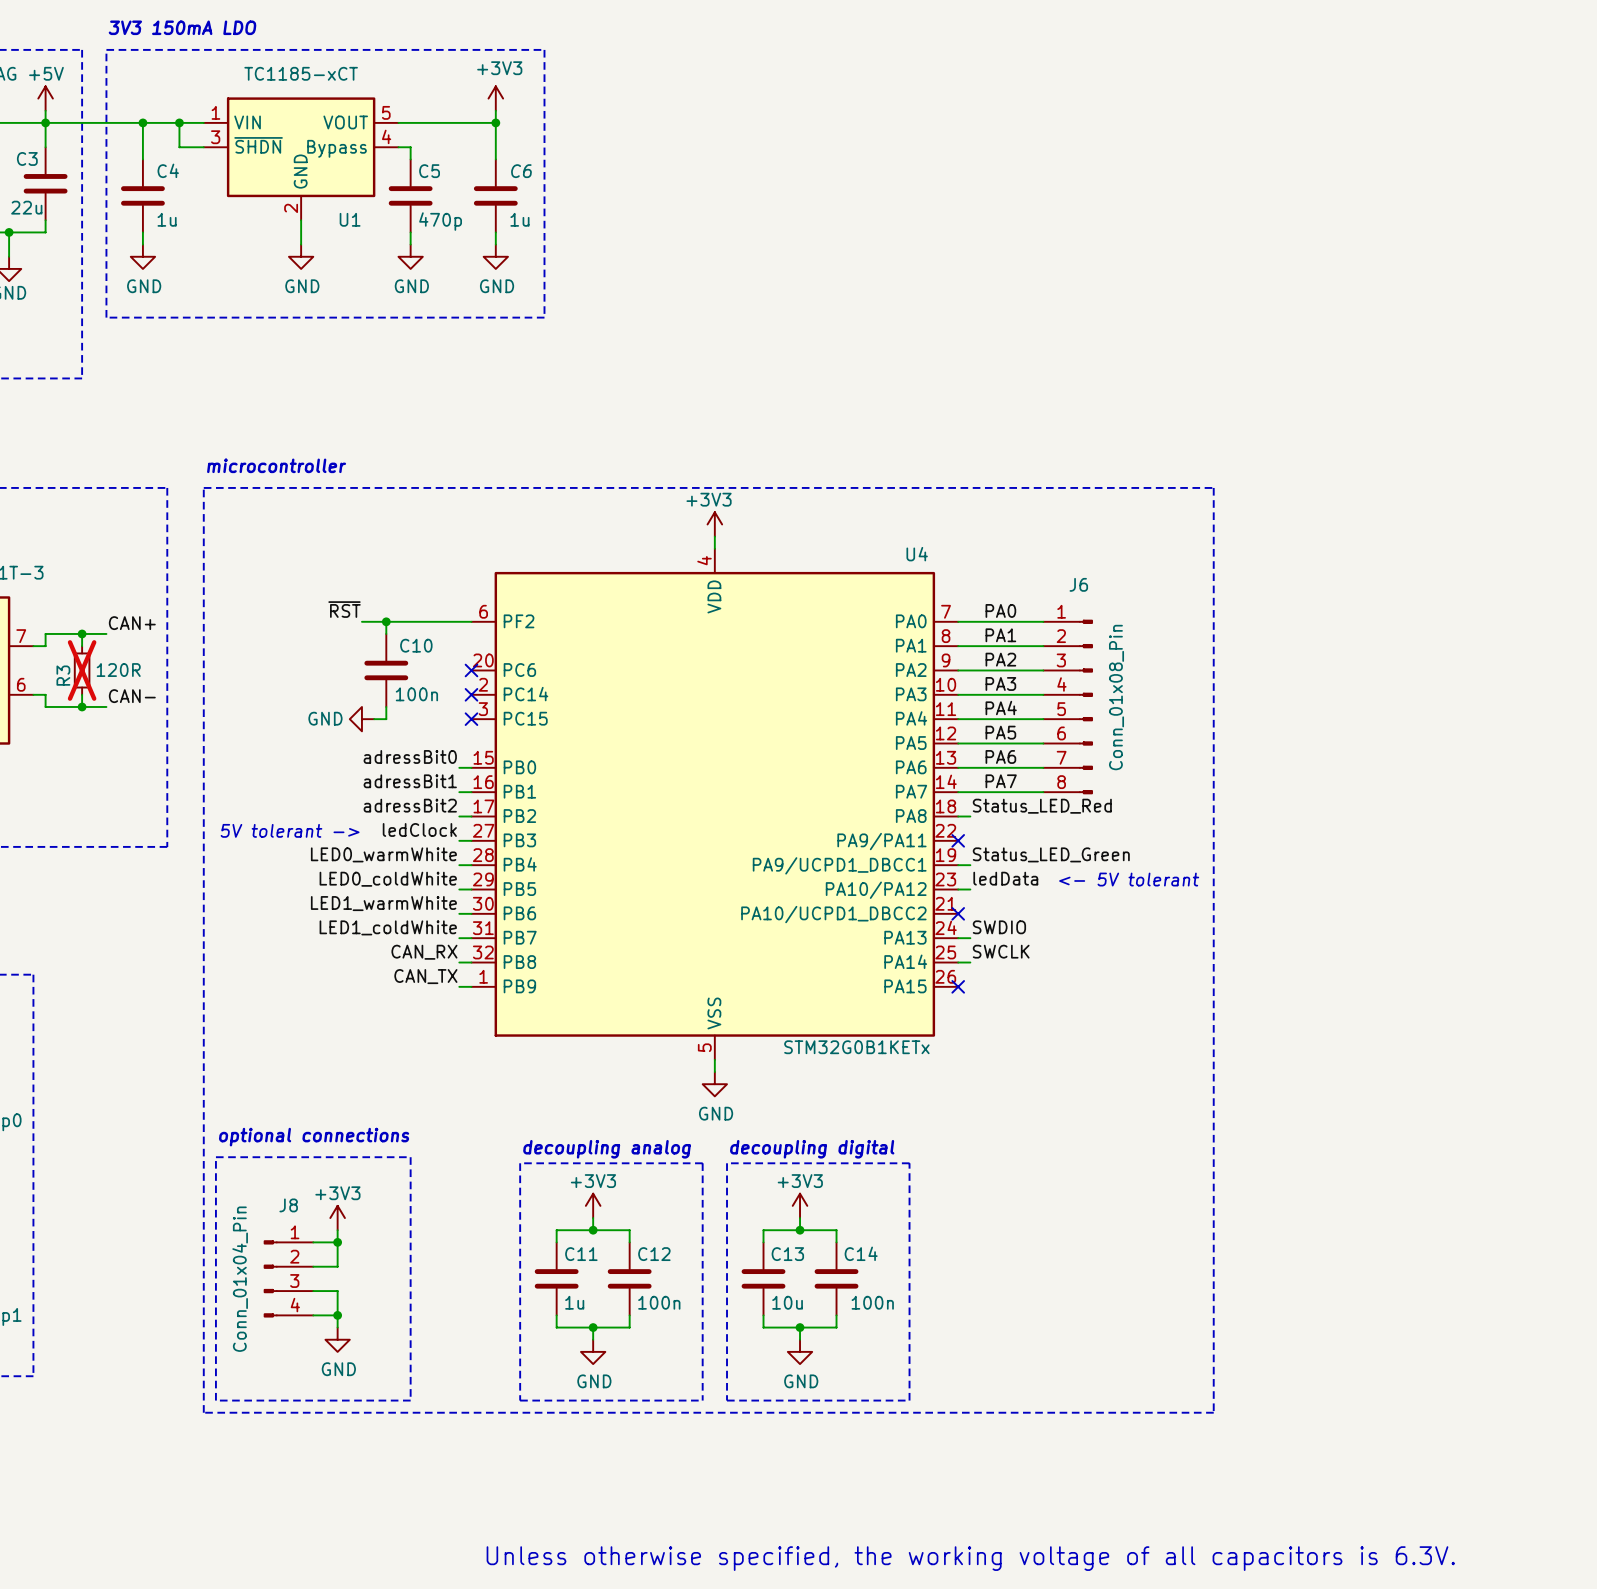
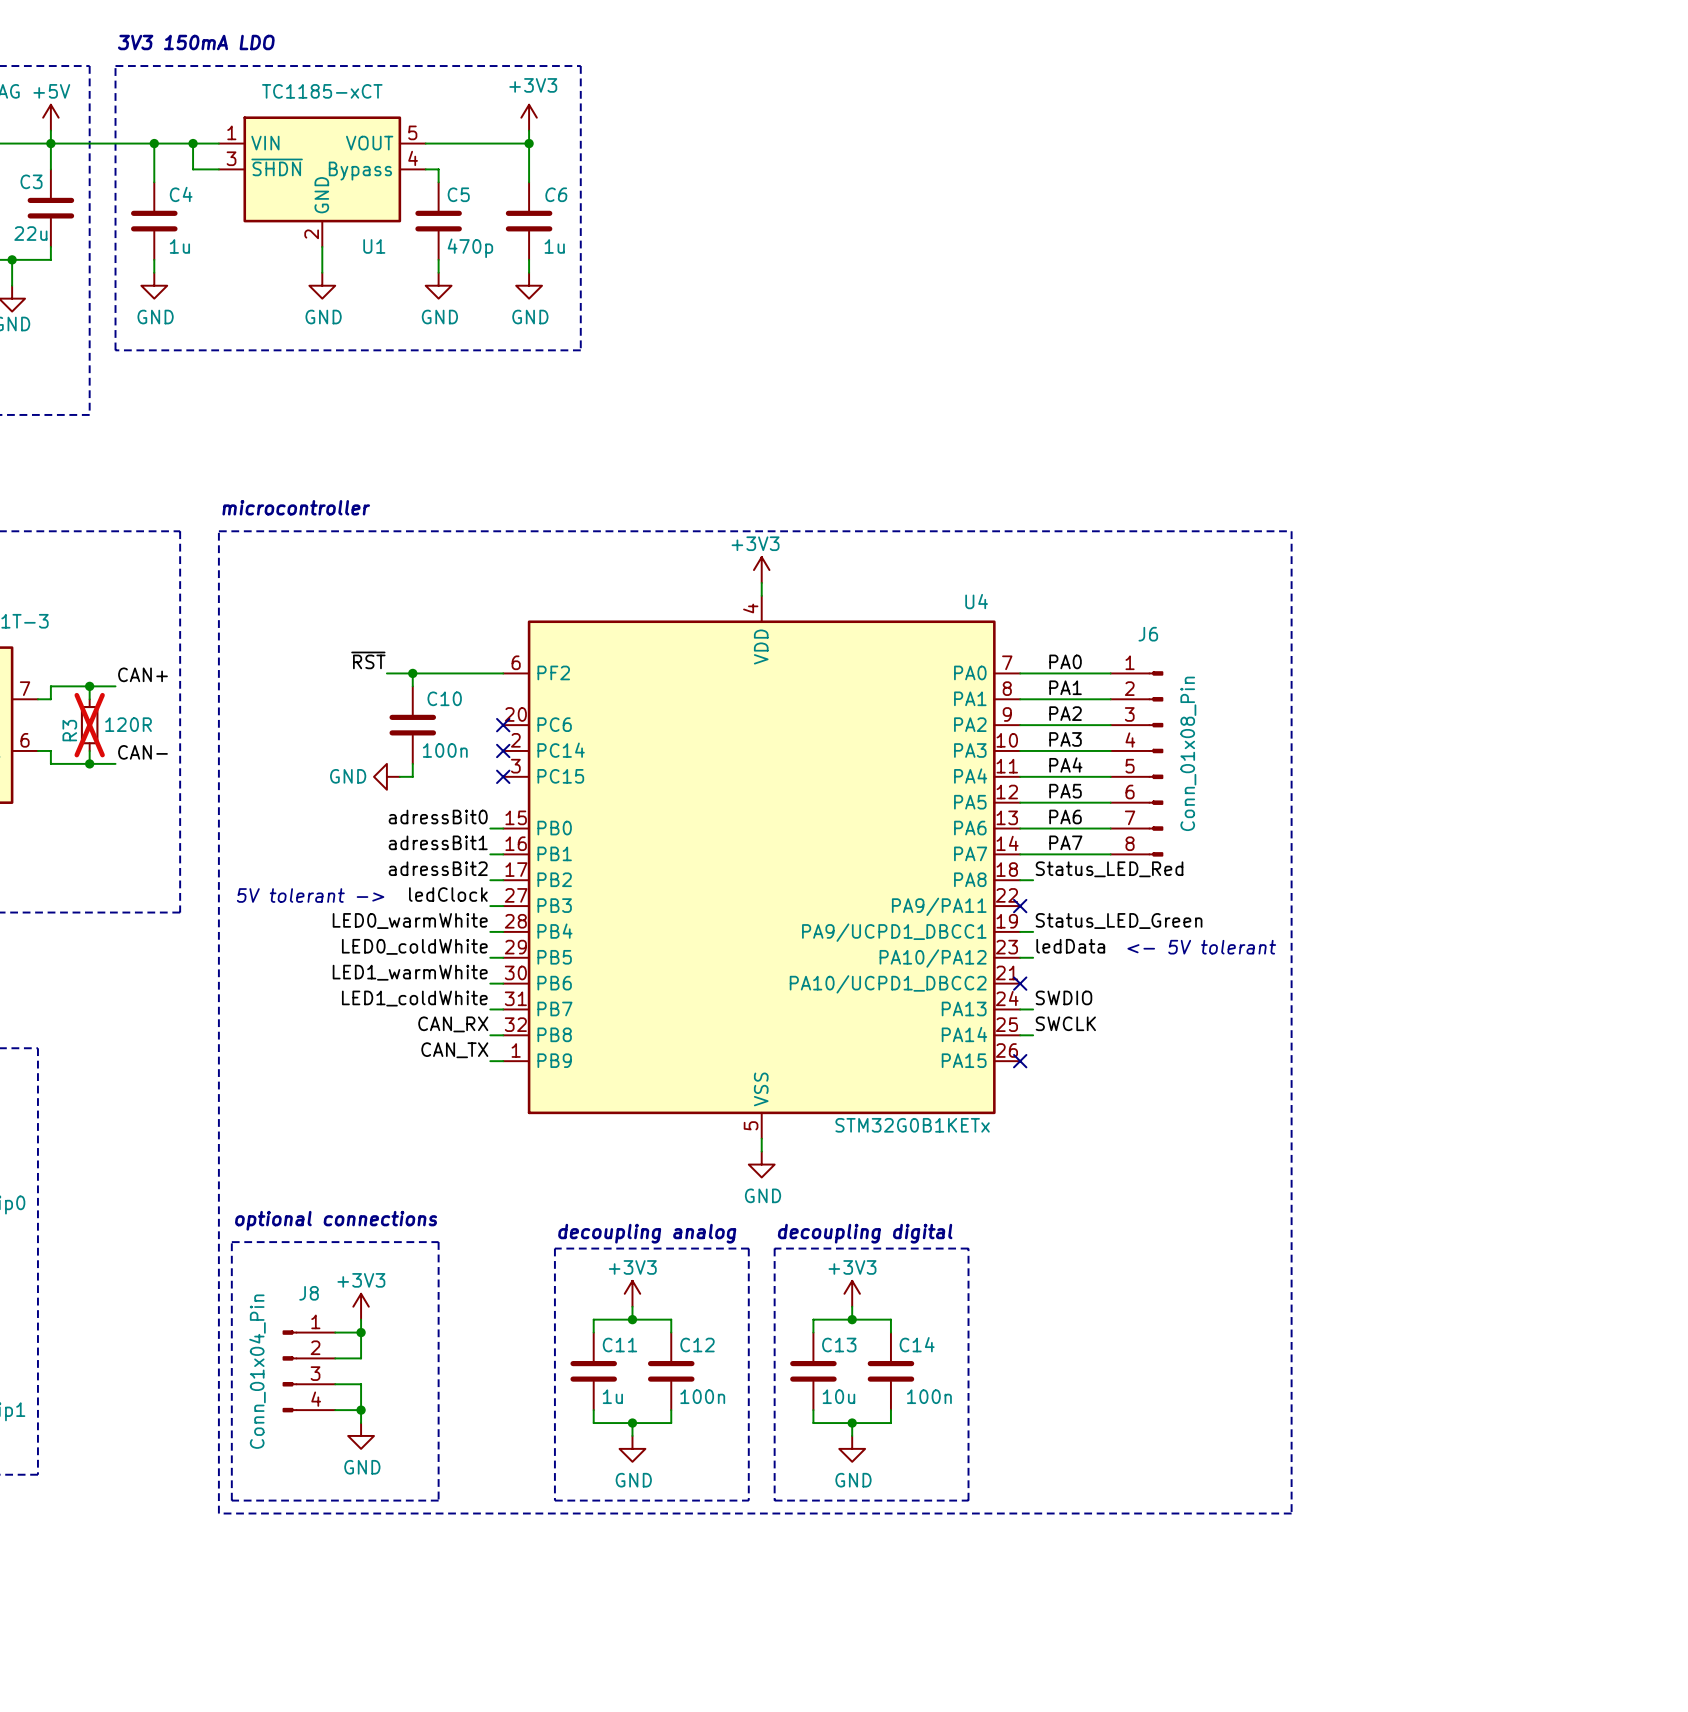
text: Unless otherwise specified, the working voltage of all capacitors is 6.3V. (970, 1558) -> none

